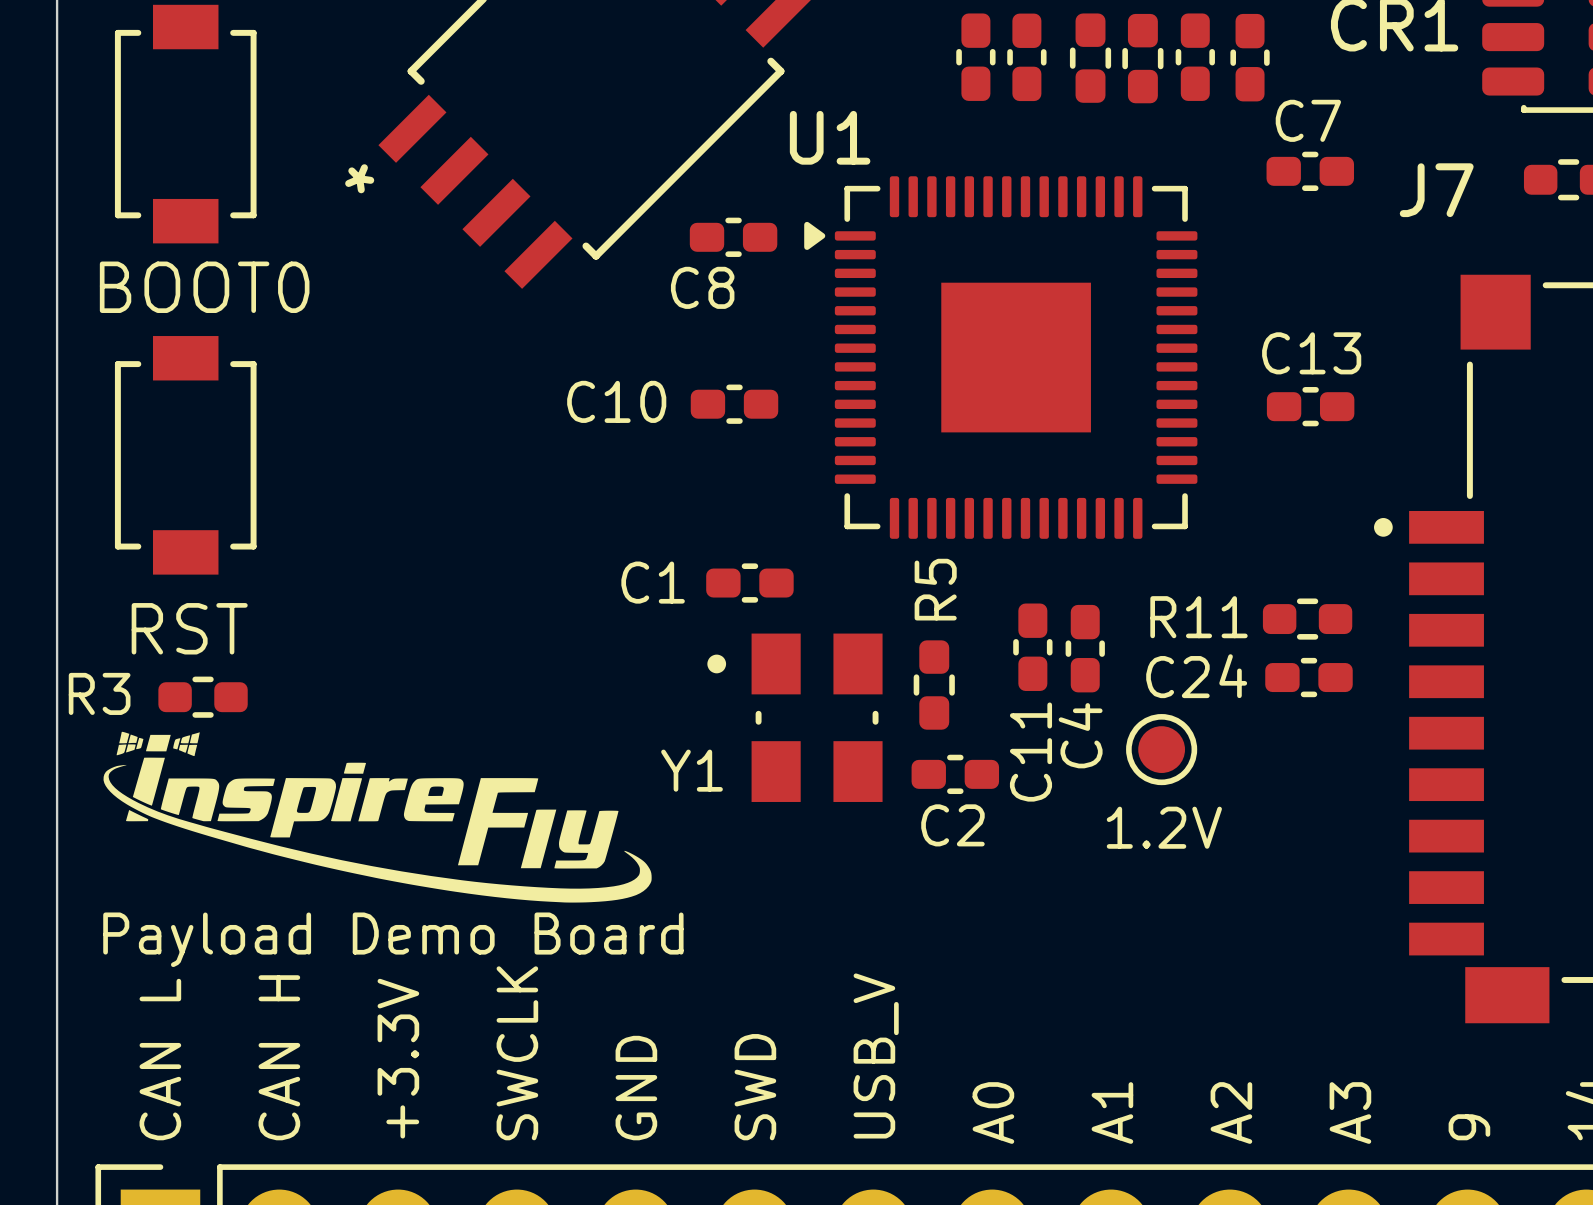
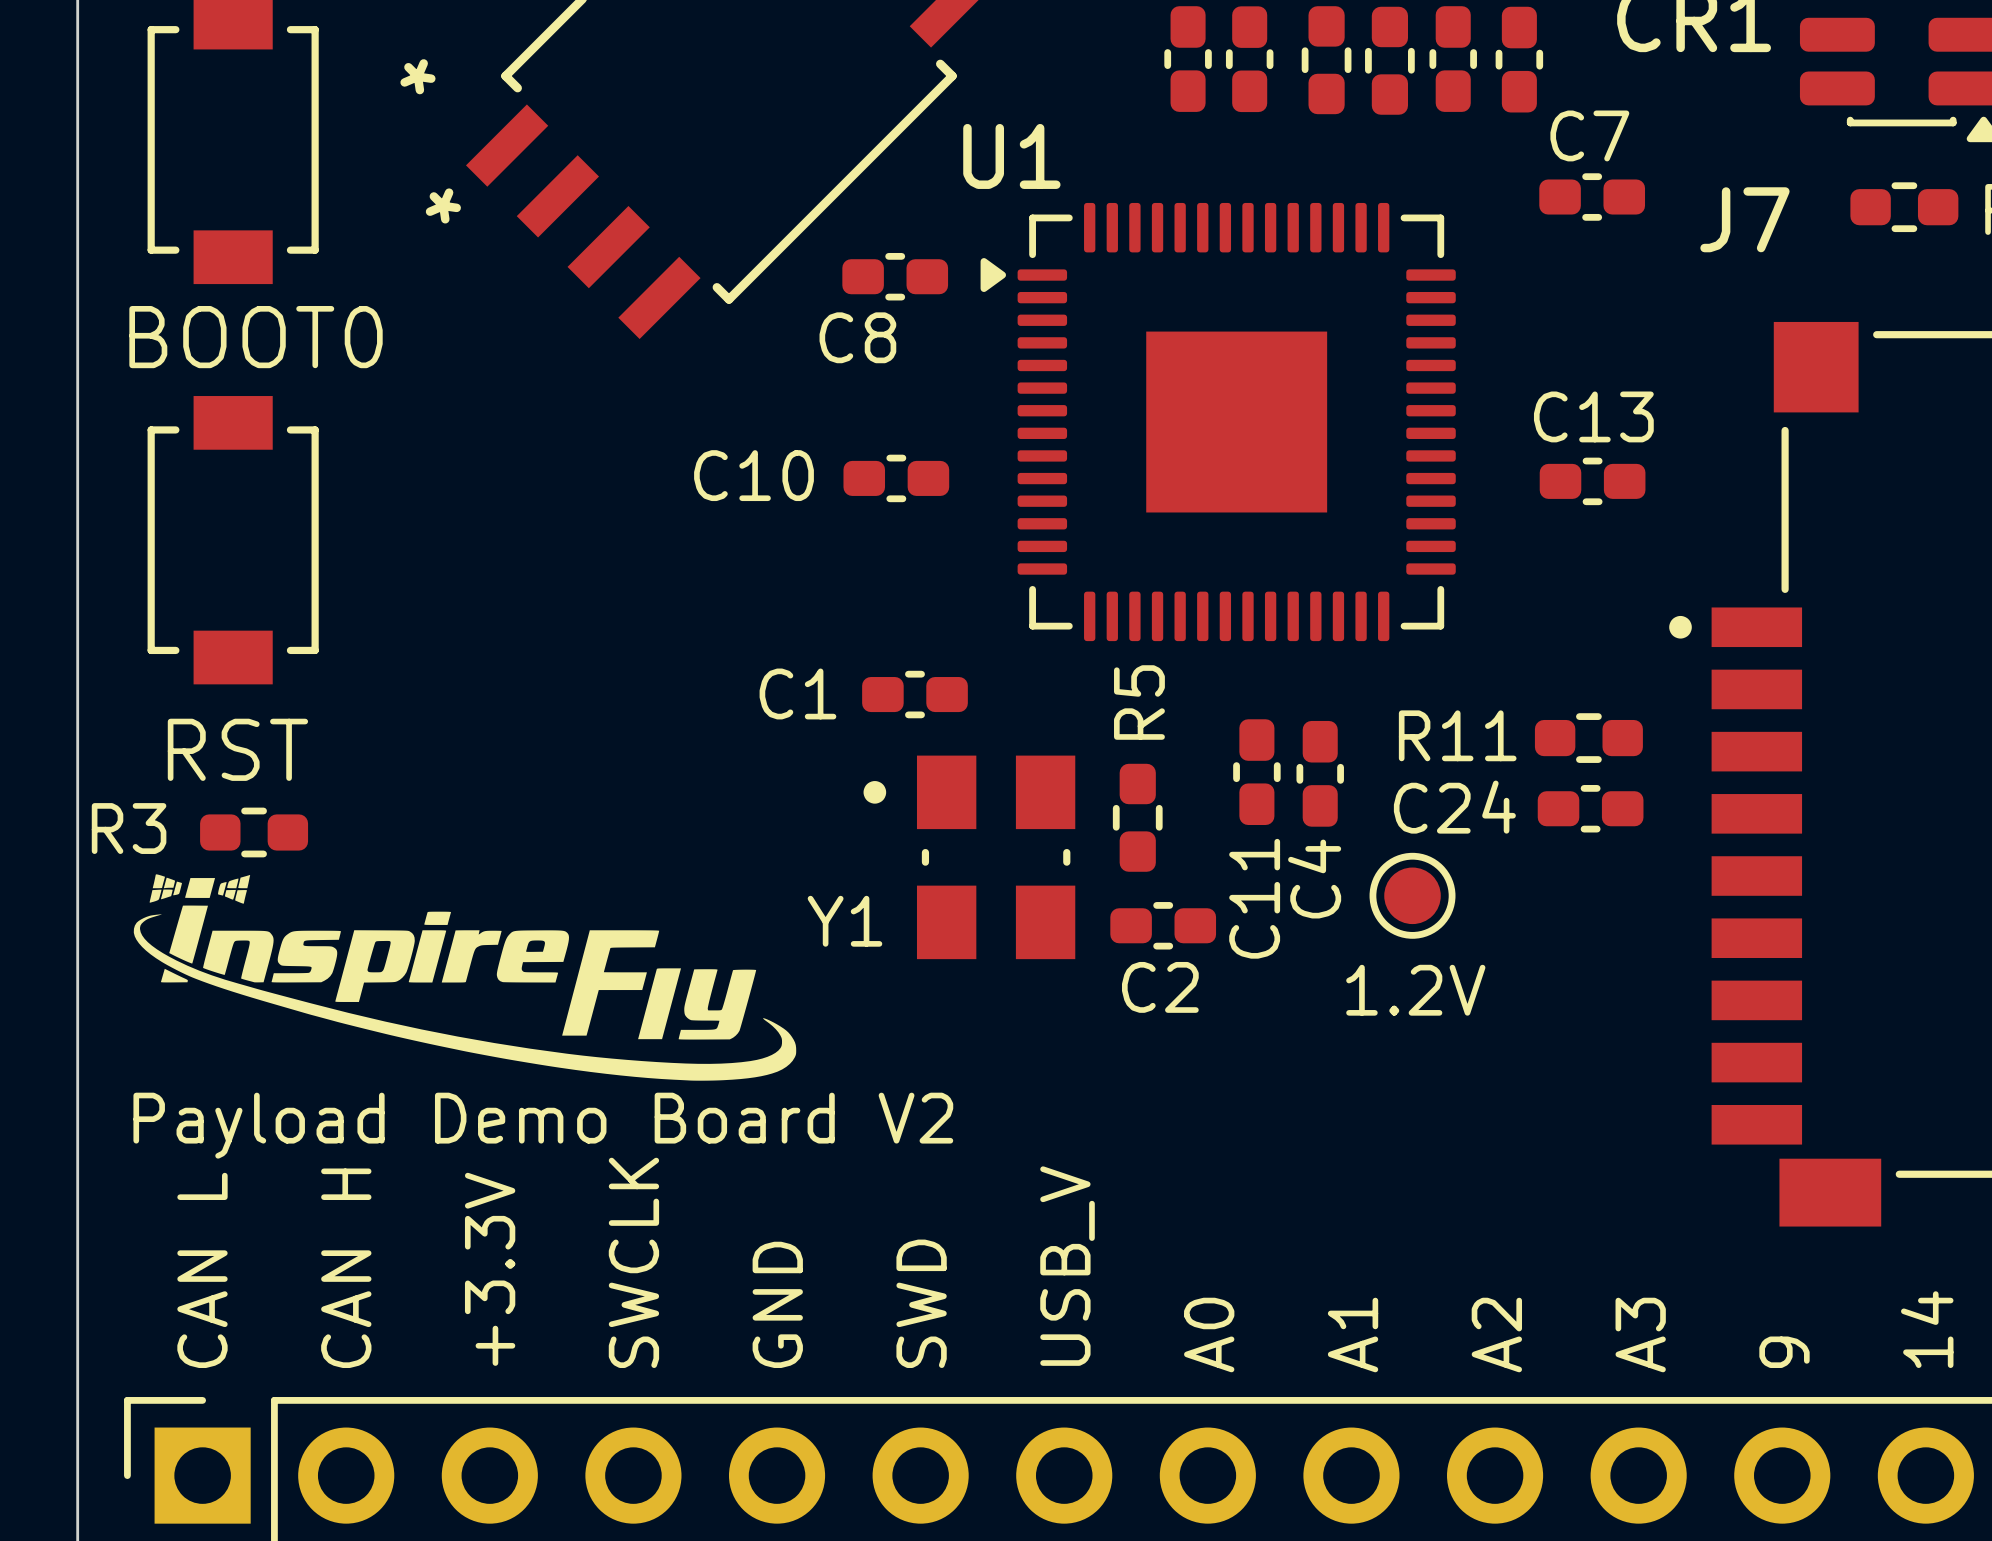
part text: none -> * (417, 76)
text: Payload Demo Board (393, 939) -> Payload Demo Board V2 (543, 1125)

